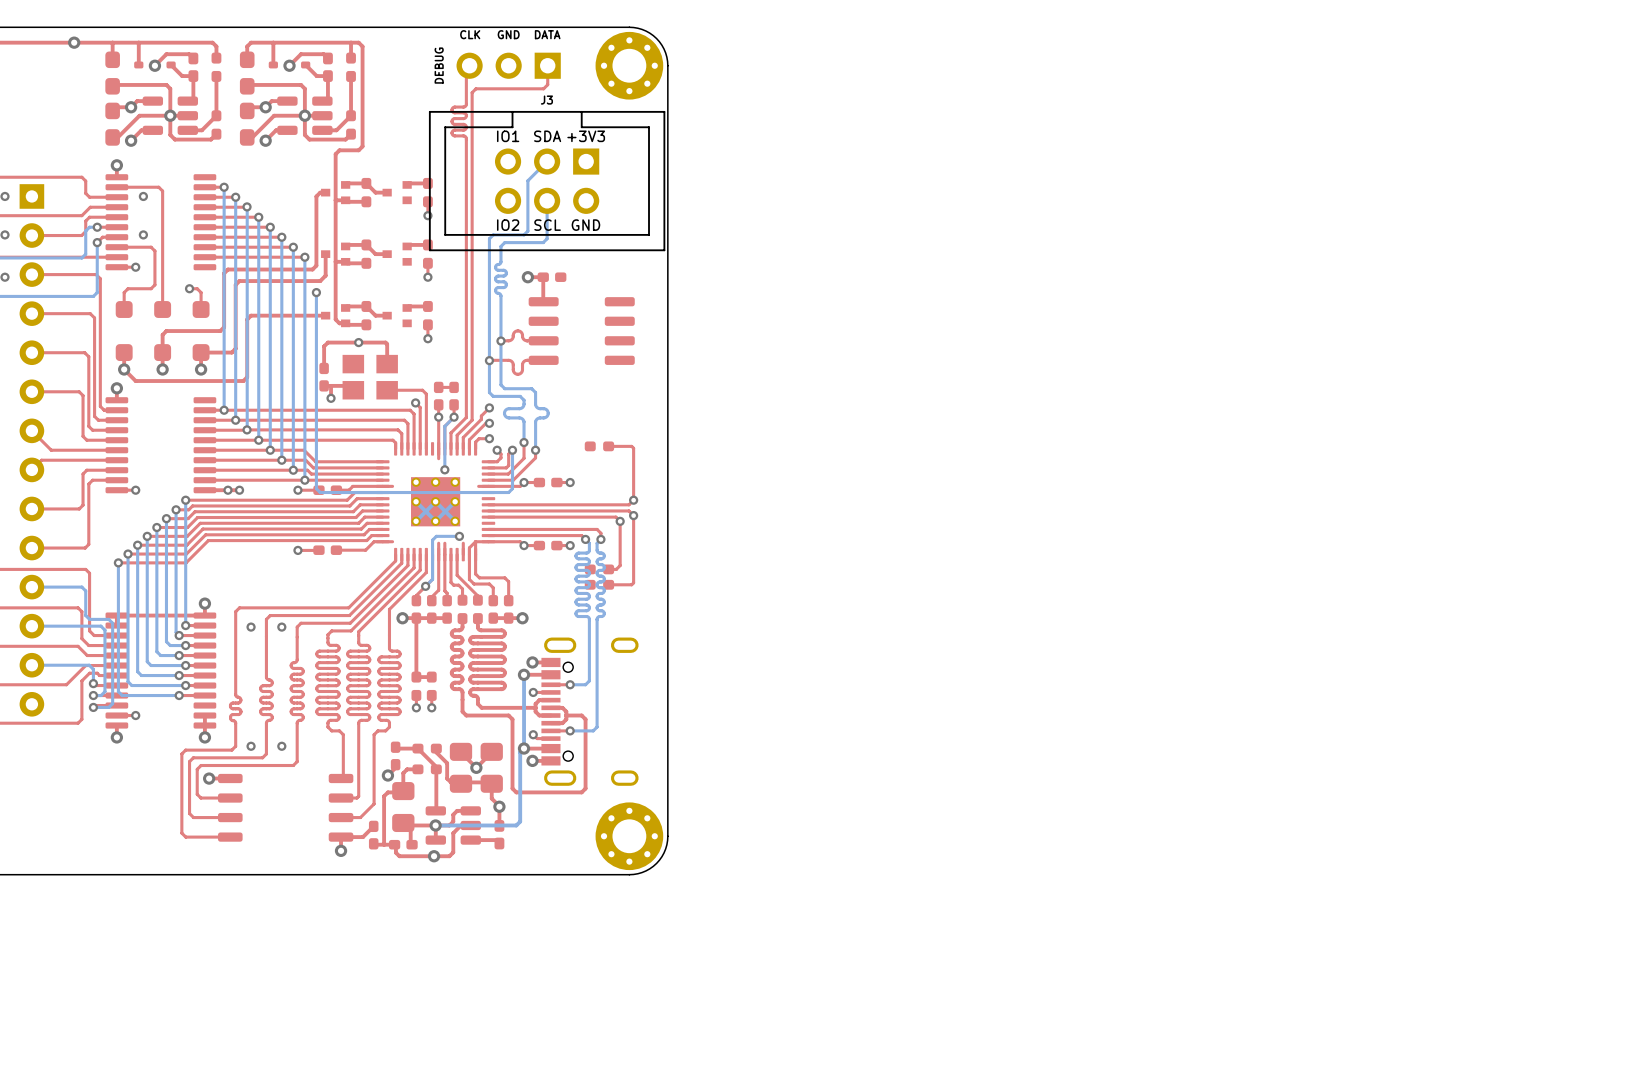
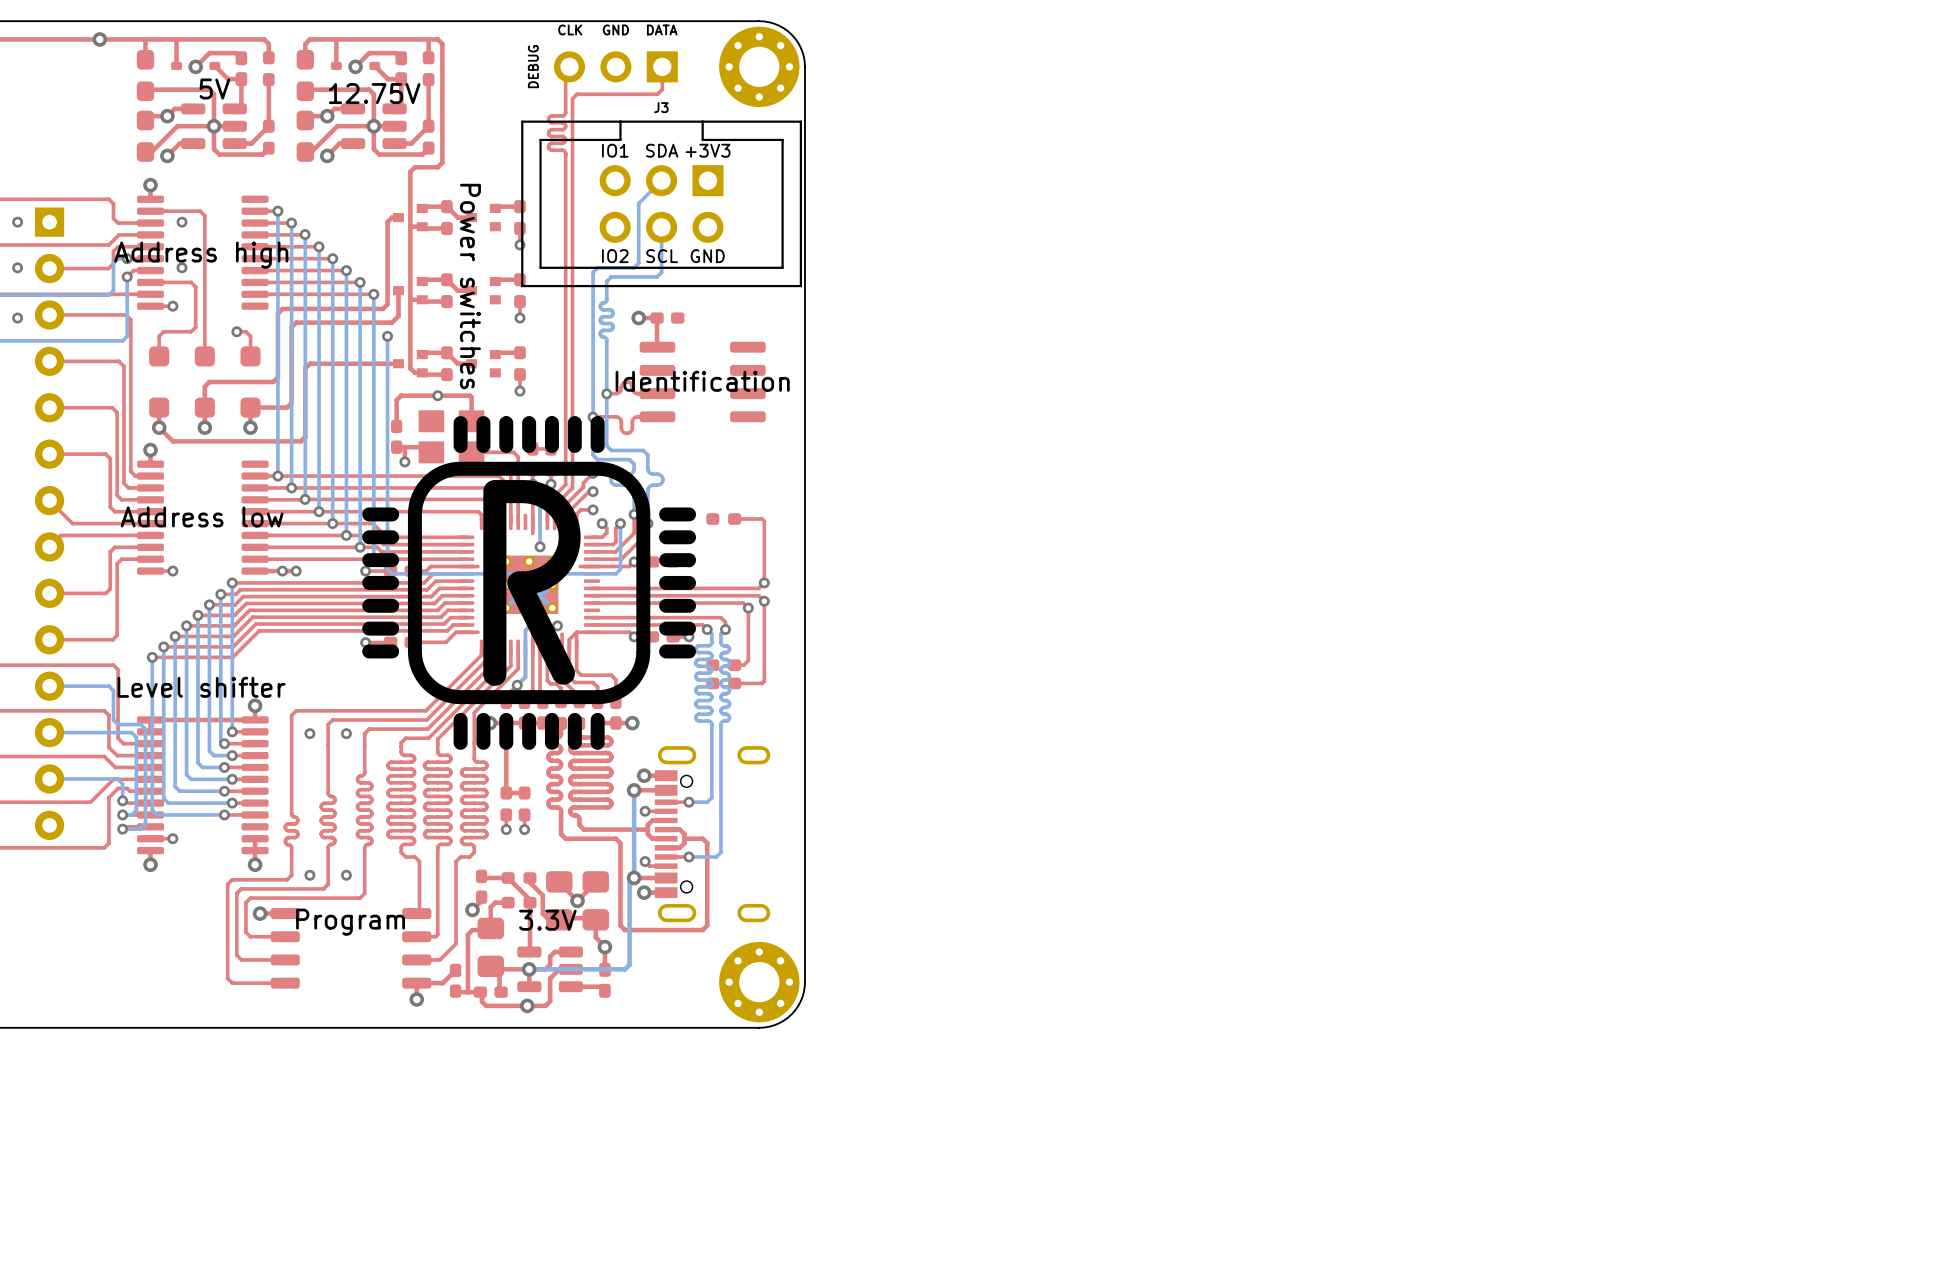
text: none -> 5V (214, 89)
text: none -> 12.75V (374, 93)
text: none -> Address high (201, 255)
text: none -> Power switches (470, 286)
text: none -> Identification (702, 381)
drawing: none -> [362, 416, 696, 750]
text: none -> Address low (202, 516)
text: none -> Level shifter (201, 687)
text: none -> 3.3V (547, 920)
text: none -> Program (350, 922)

